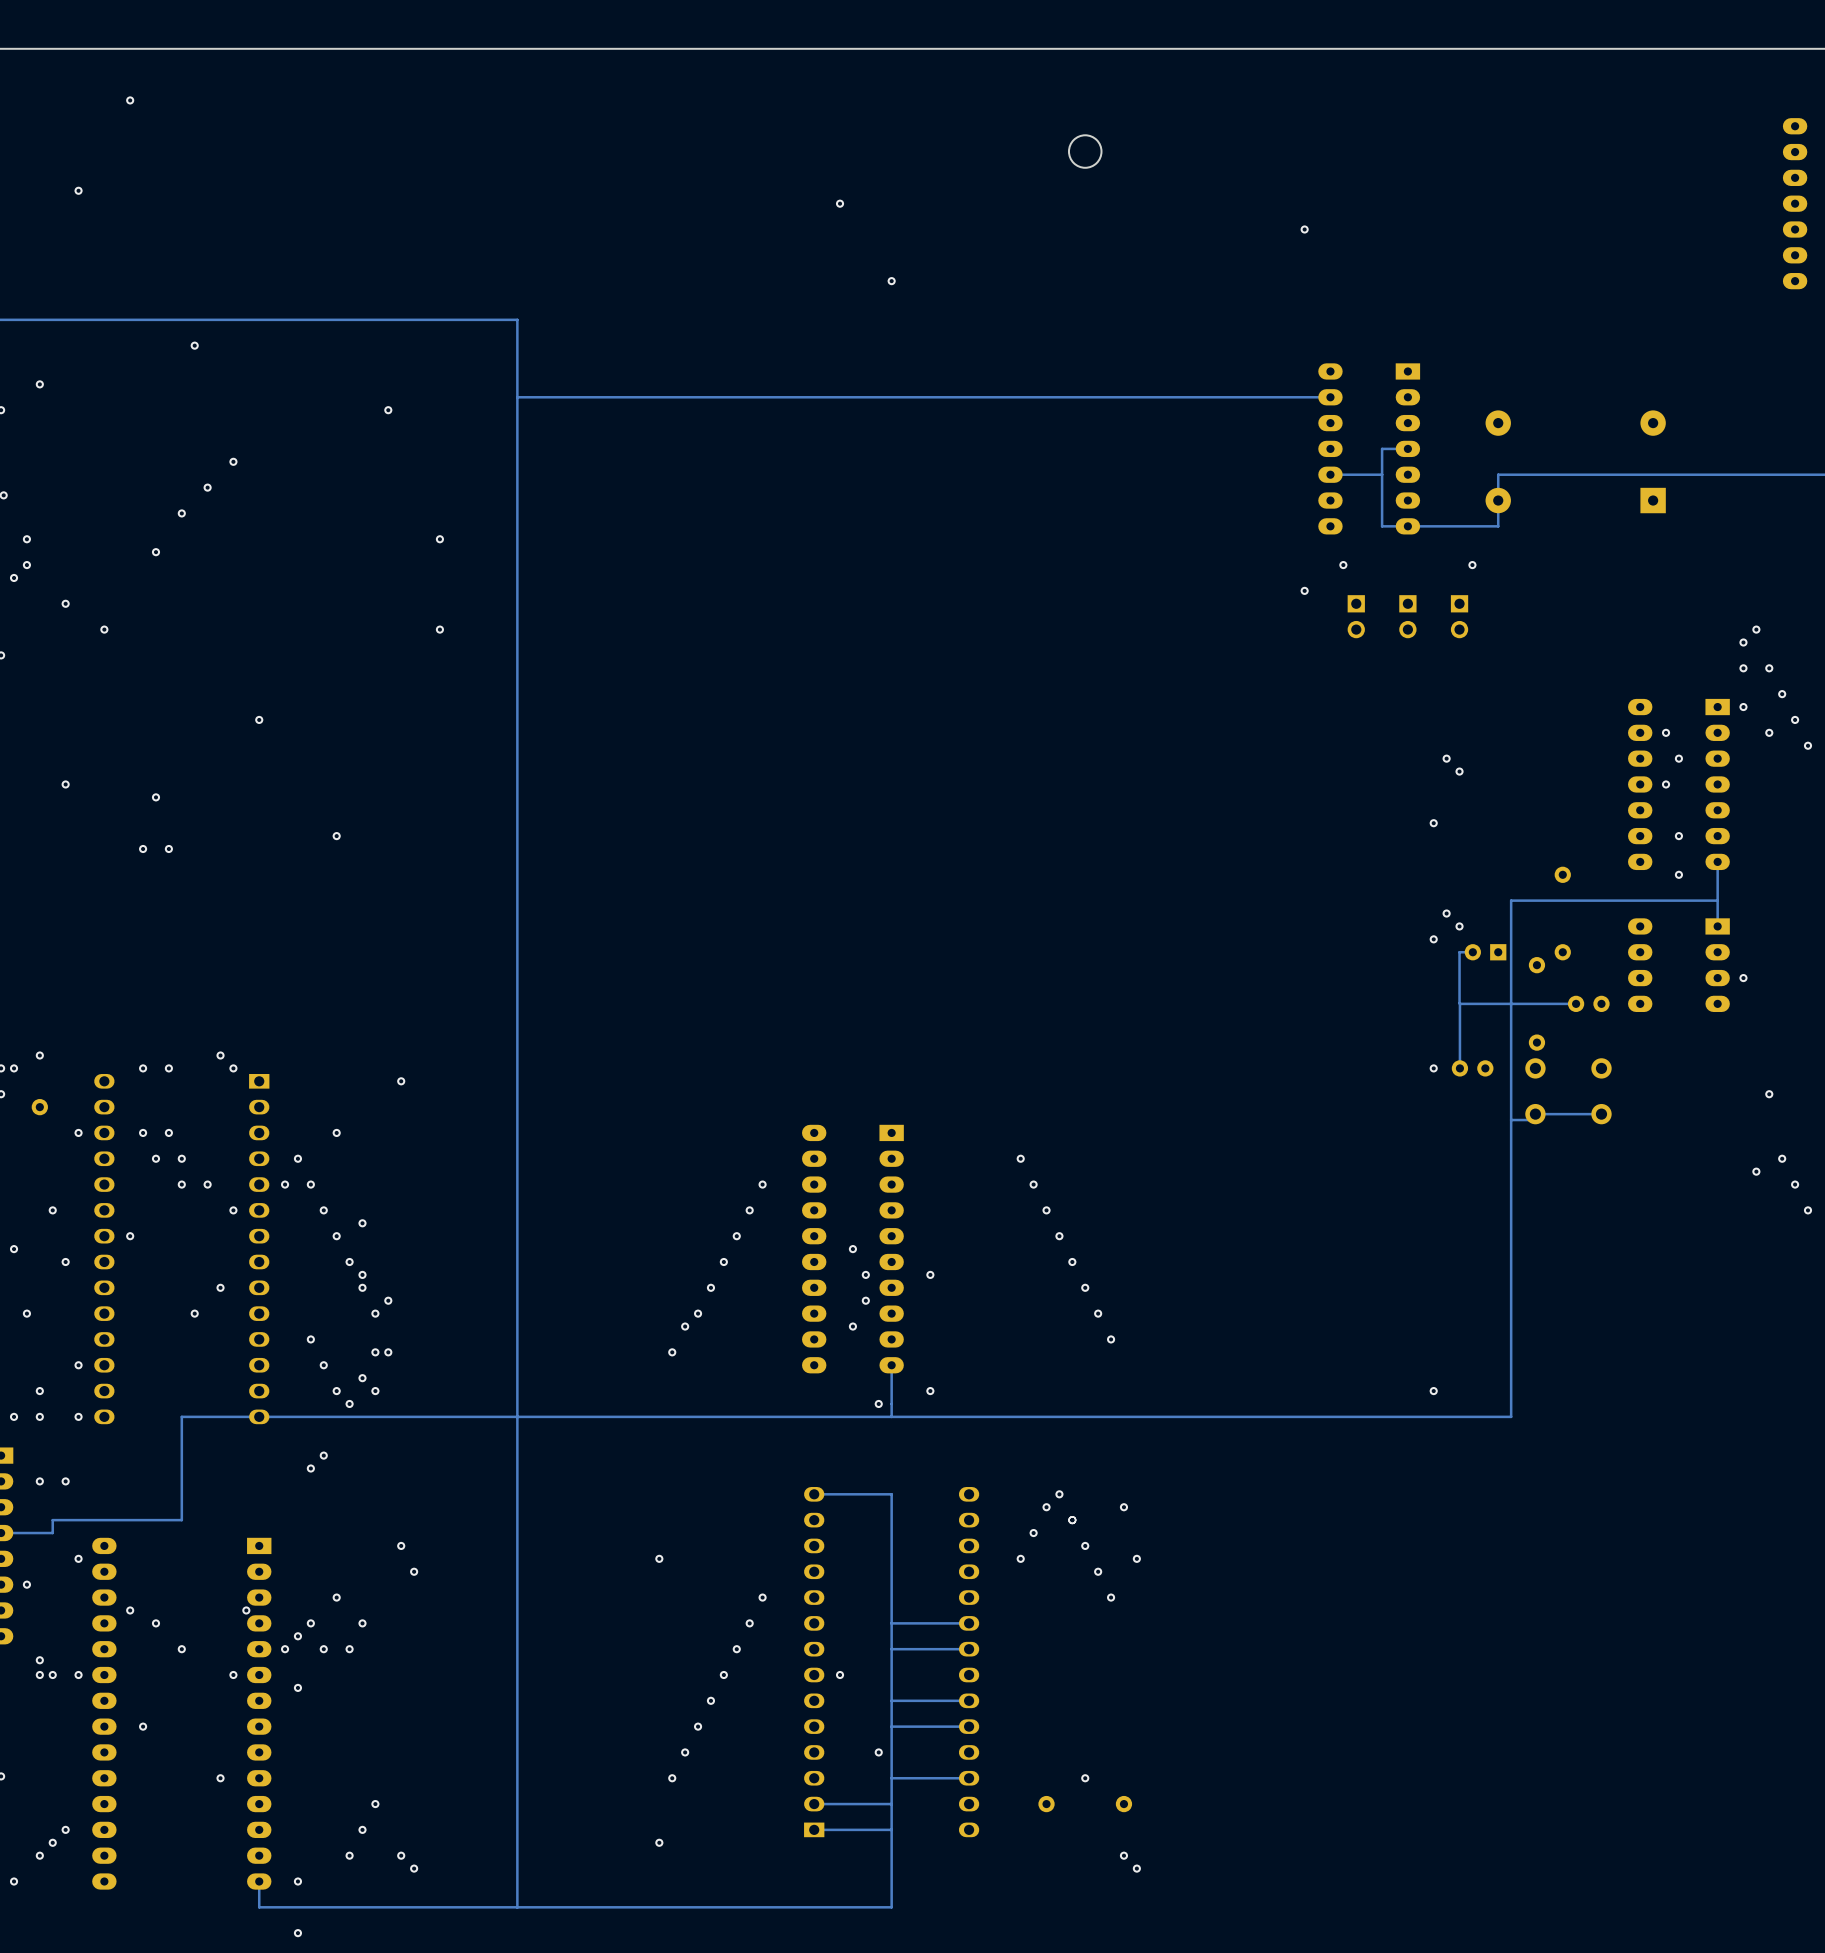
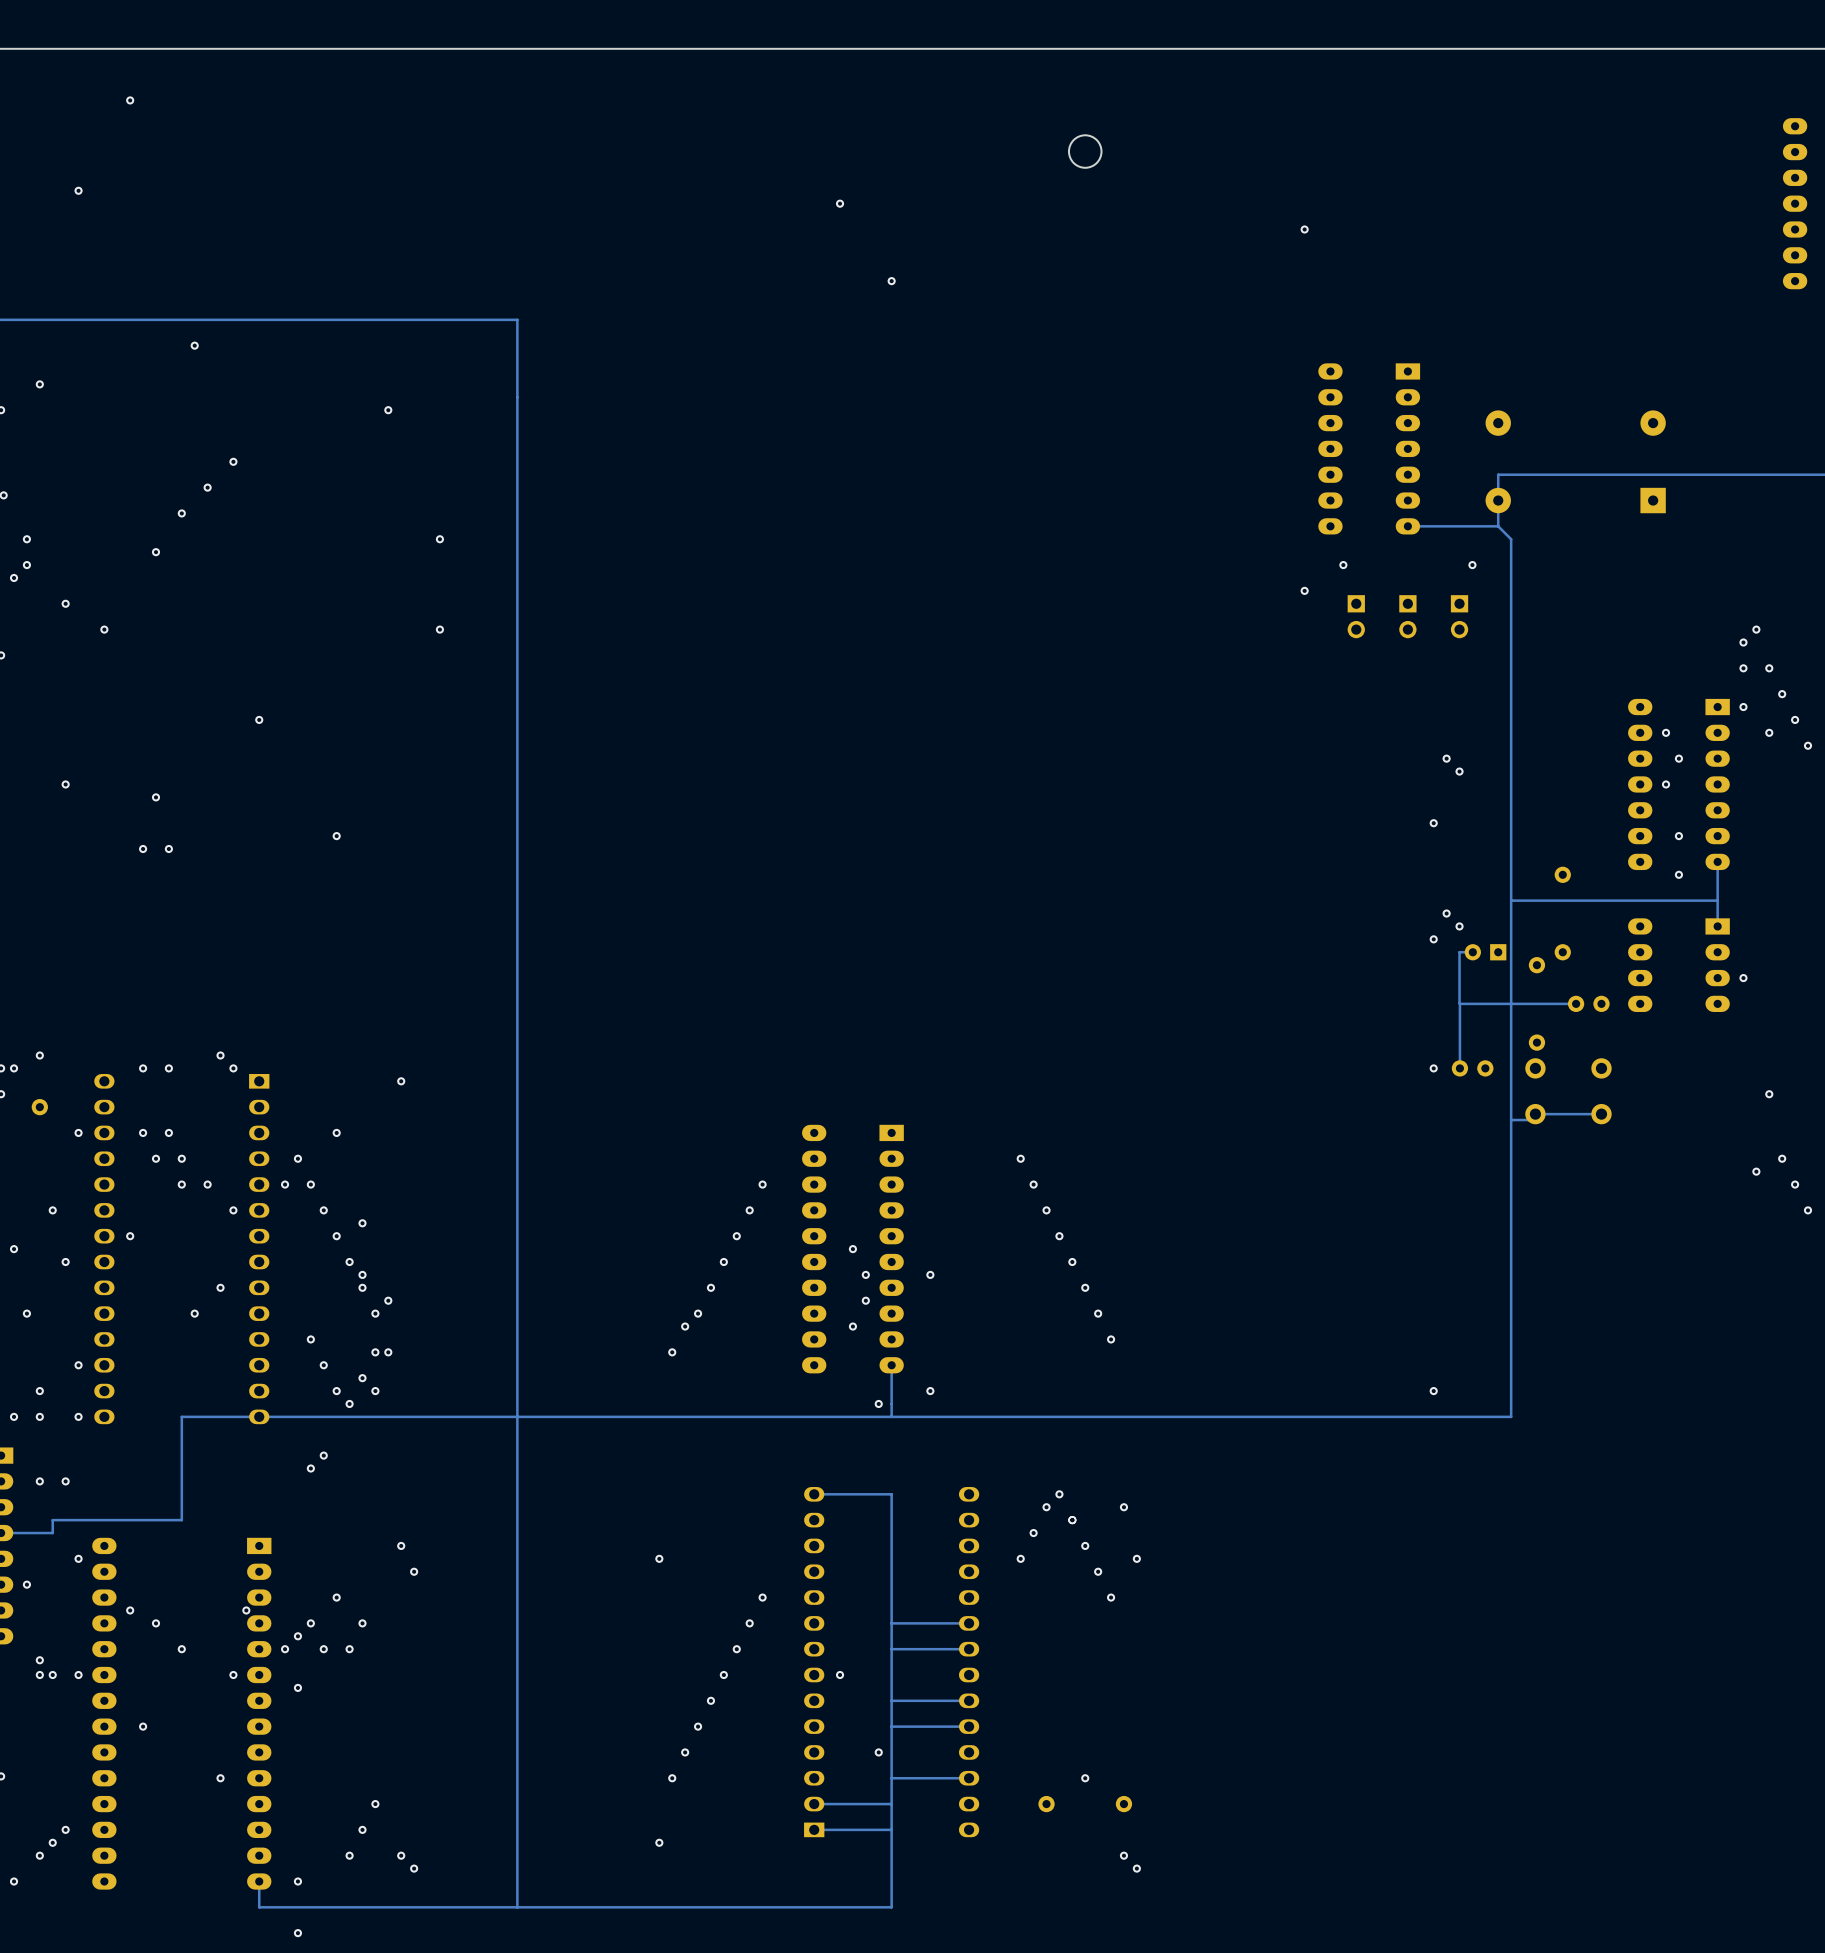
track: (1330, 397) (517, 397) -> none
track: (1407, 448) (1382, 448) (1382, 526) (1407, 526) -> none
track: (1382, 474) (1330, 474) -> none
track: none -> (1498, 526) (1511, 539) (1511, 900)

